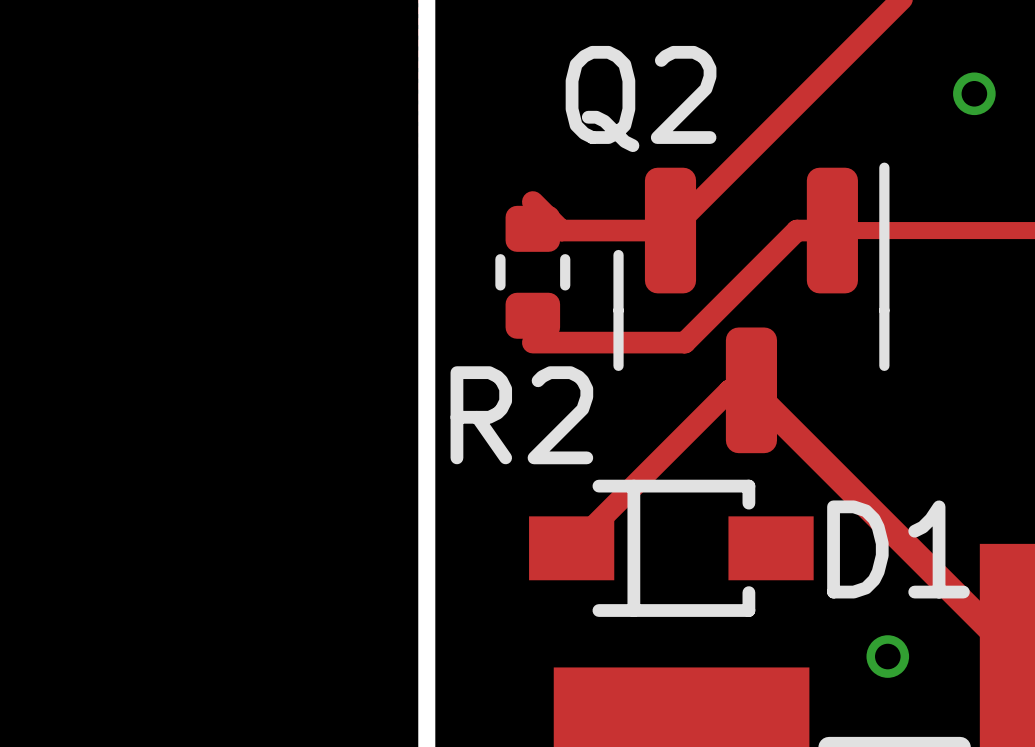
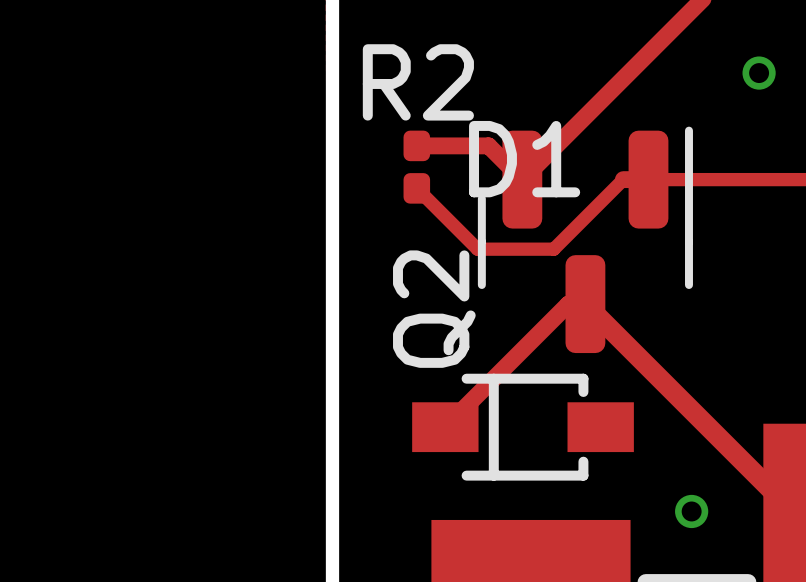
Q2 name rotation: 0° (641, 98) -> 90° counterclockwise (434, 309)
Q2 name position: Q2 (641, 98) -> Q2 (434, 309)
top track: (532, 202) (561, 230) (670, 230) -> (416, 145) (488, 145) (522, 179)
R2 footprint: [495, 205, 571, 339] -> [403, 130, 431, 204]
top track: (800, 230) (796, 230) (684, 342) (532, 342) -> (623, 179) (553, 249) (477, 249) (416, 188)
R2 name position: R2 (521, 415) -> R2 (418, 82)
D1 name position: D1 (898, 549) -> D1 (524, 159)

